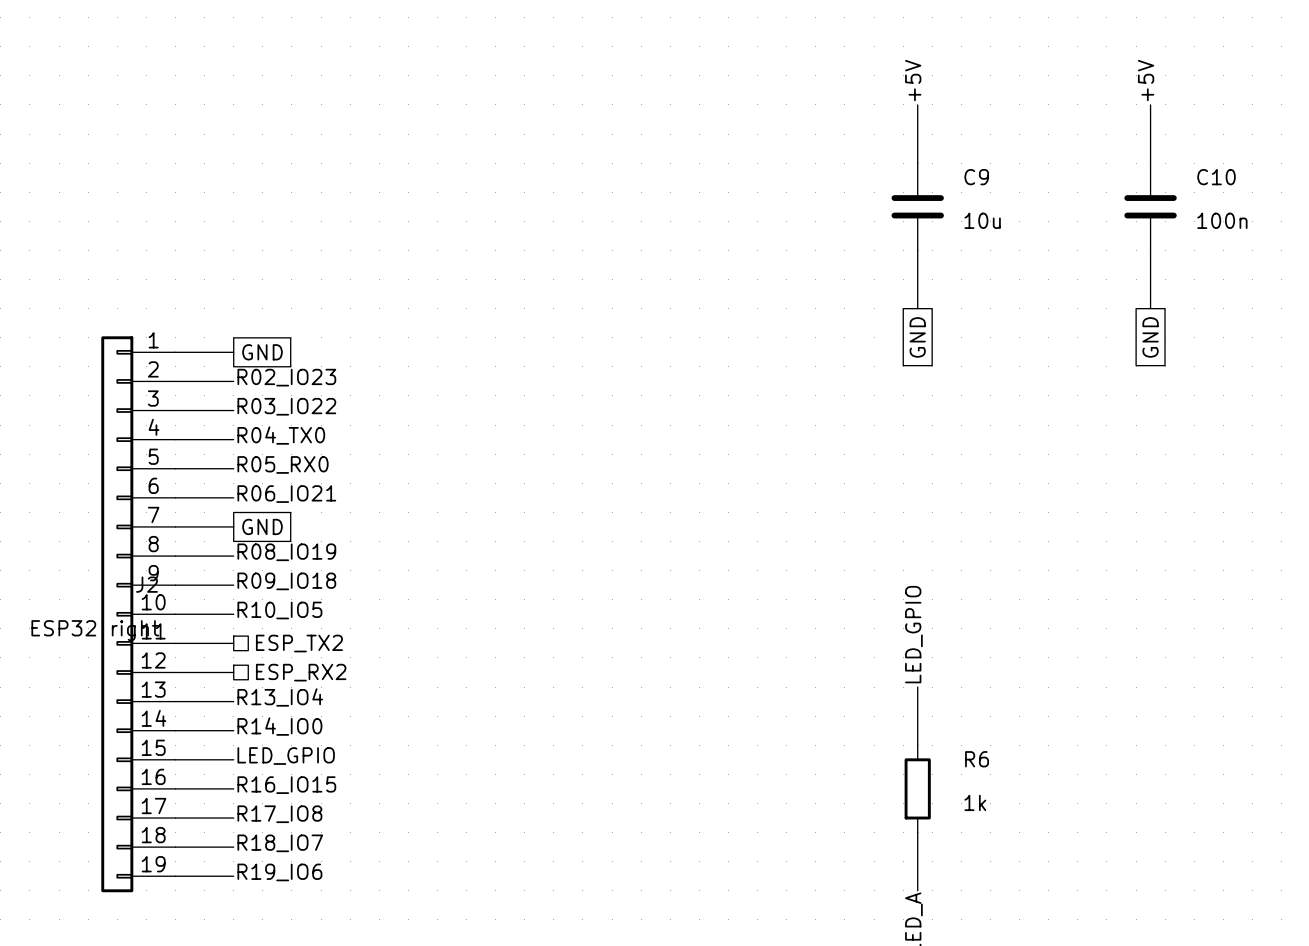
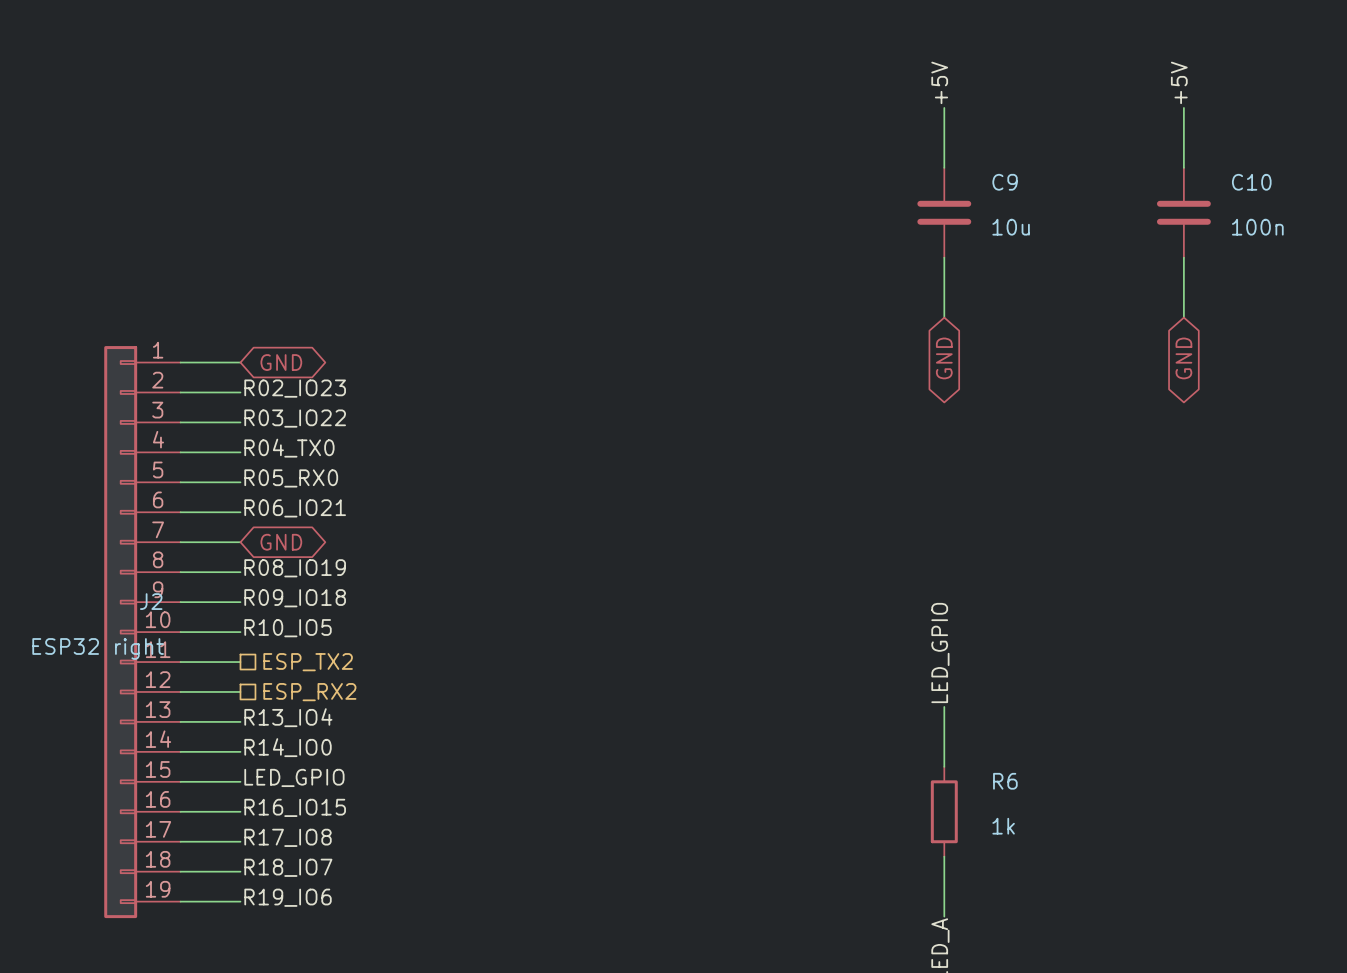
global label shape: passive (917, 337) -> bidirectional (944, 358)
global label shape: passive (1150, 337) -> bidirectional (1183, 358)
global label shape: passive (262, 352) -> bidirectional (281, 362)
global label shape: passive (262, 526) -> bidirectional (281, 542)

